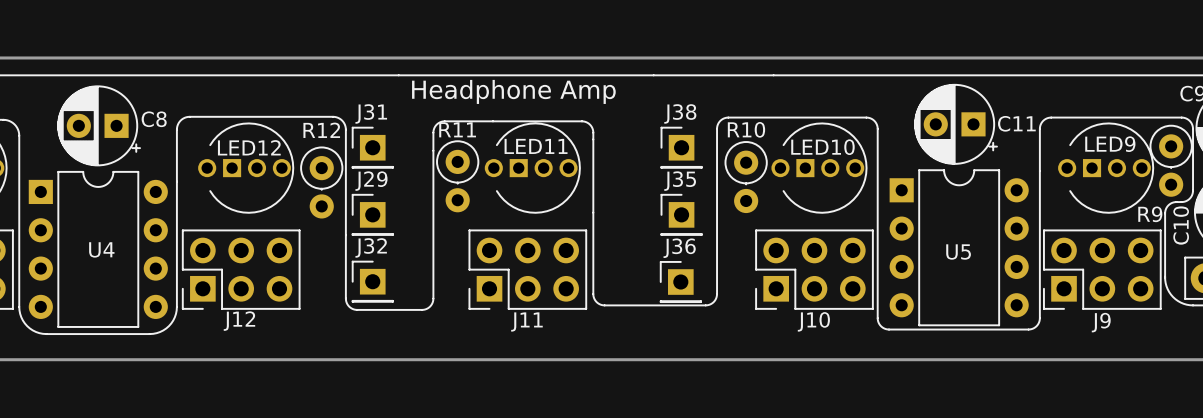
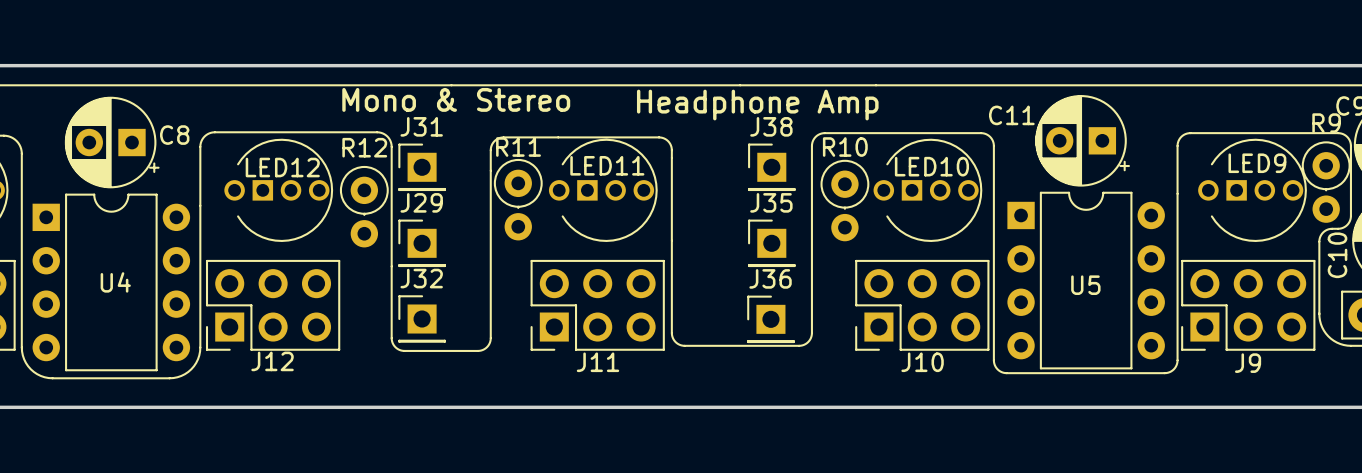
text: none -> Mono & Stereo (456, 99)
text position: Headphone Amp (513, 91) -> Headphone Amp (757, 105)
C11 name position: C11 (1016, 123) -> C11 (1011, 115)
R9 name position: R9 (1150, 214) -> R9 (1326, 123)

